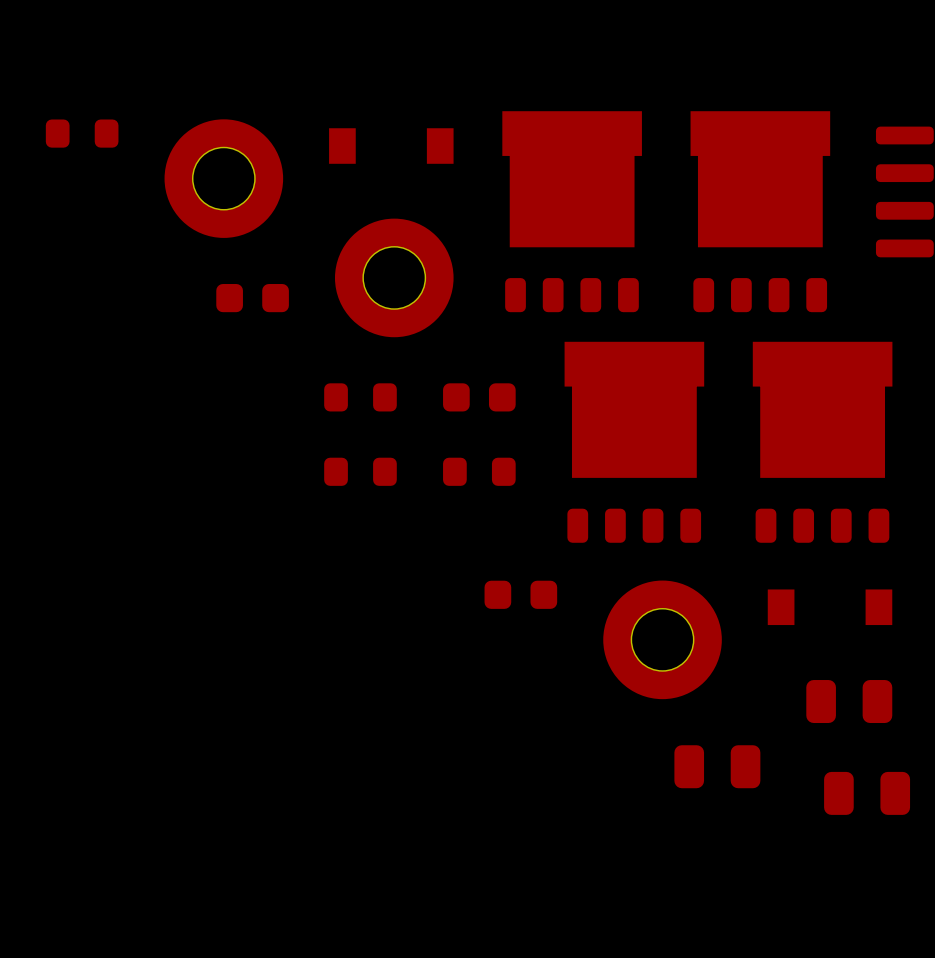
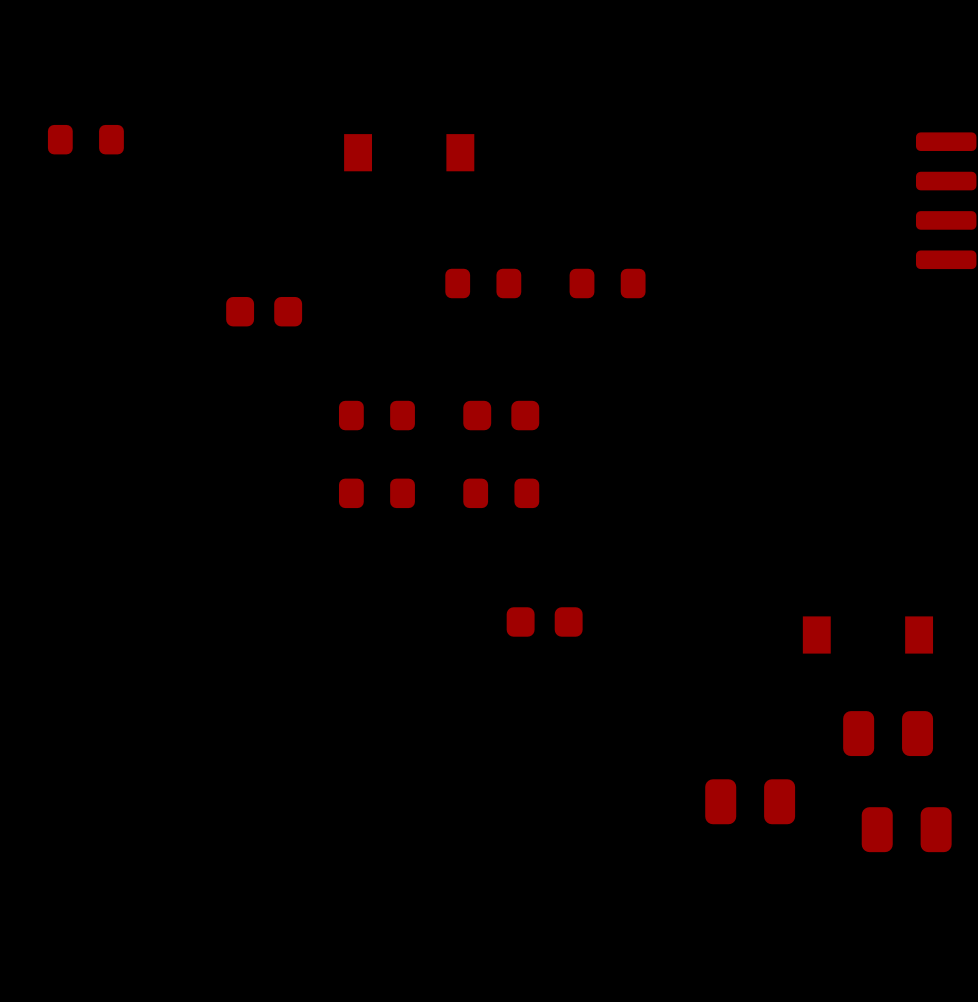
part: (223, 178) -> none
part: (572, 211) -> none
part: (760, 211) -> none
part: none -> (483, 283)
part: none -> (607, 283)
part: (394, 277) -> none
part: (634, 442) -> none
part: (822, 442) -> none
part: (662, 639) -> none

